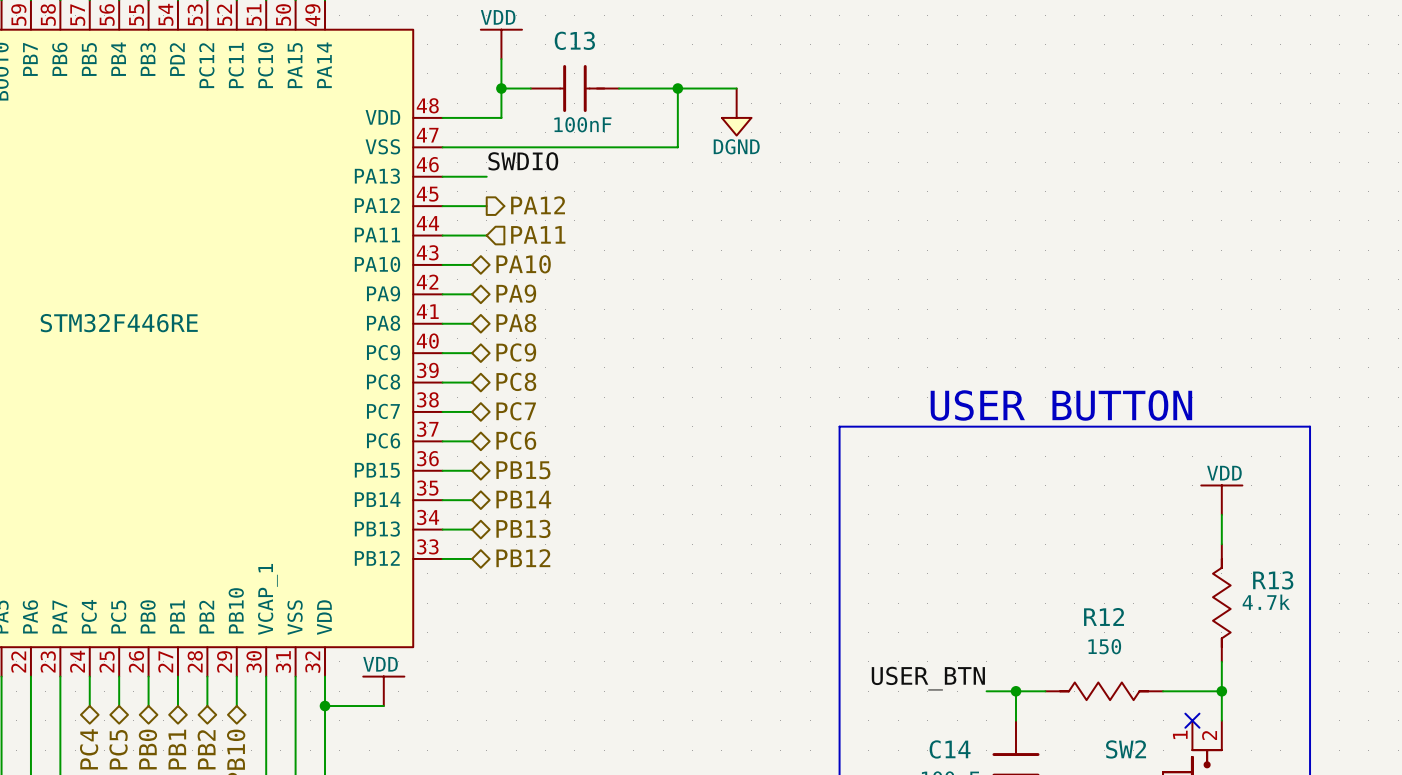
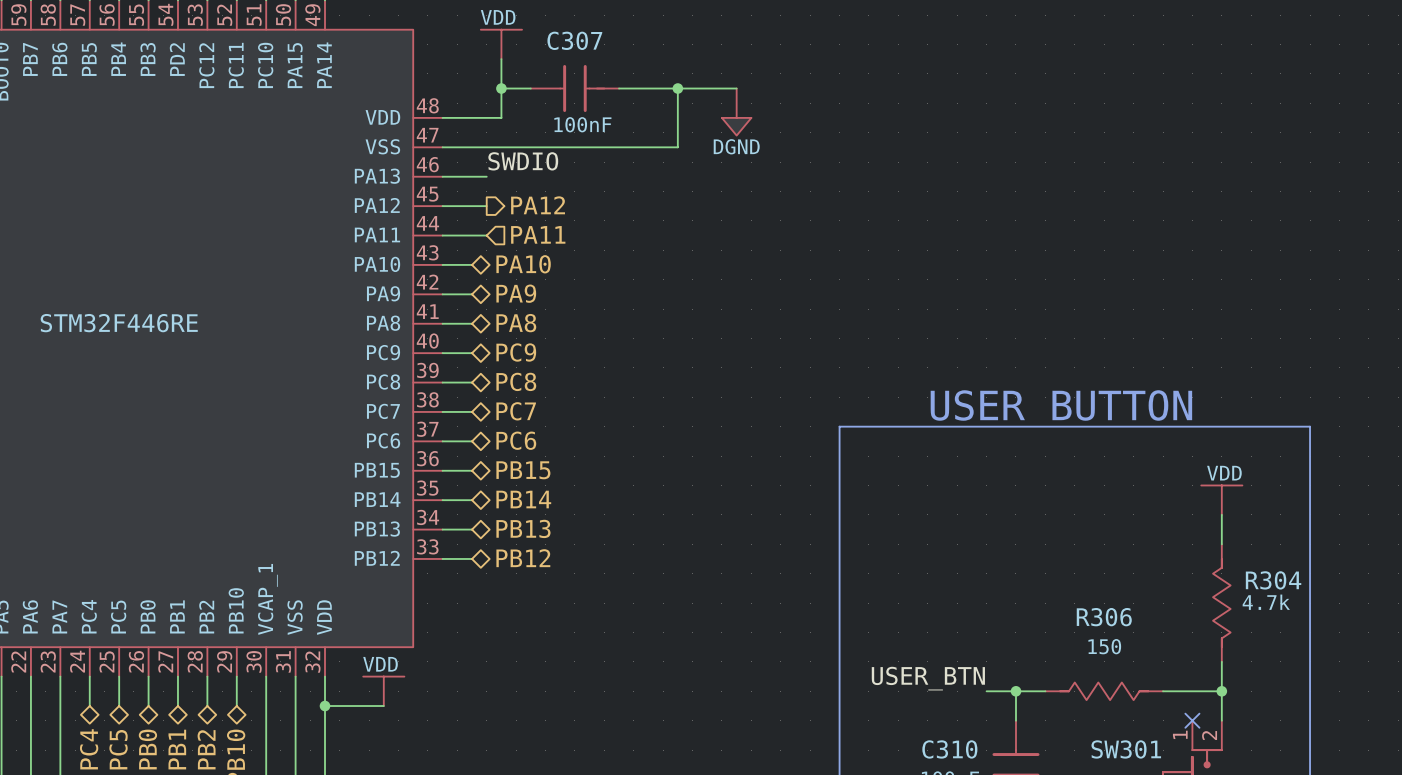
C13 name: C13 (574, 40) -> C307 (574, 40)
R13 name: R13 (1273, 580) -> R304 (1273, 580)
R12 name: R12 (1104, 616) -> R306 (1104, 617)
C14 name: C14 (950, 749) -> C310 (949, 749)
SW2 name: SW2 (1126, 749) -> SW301 (1126, 749)

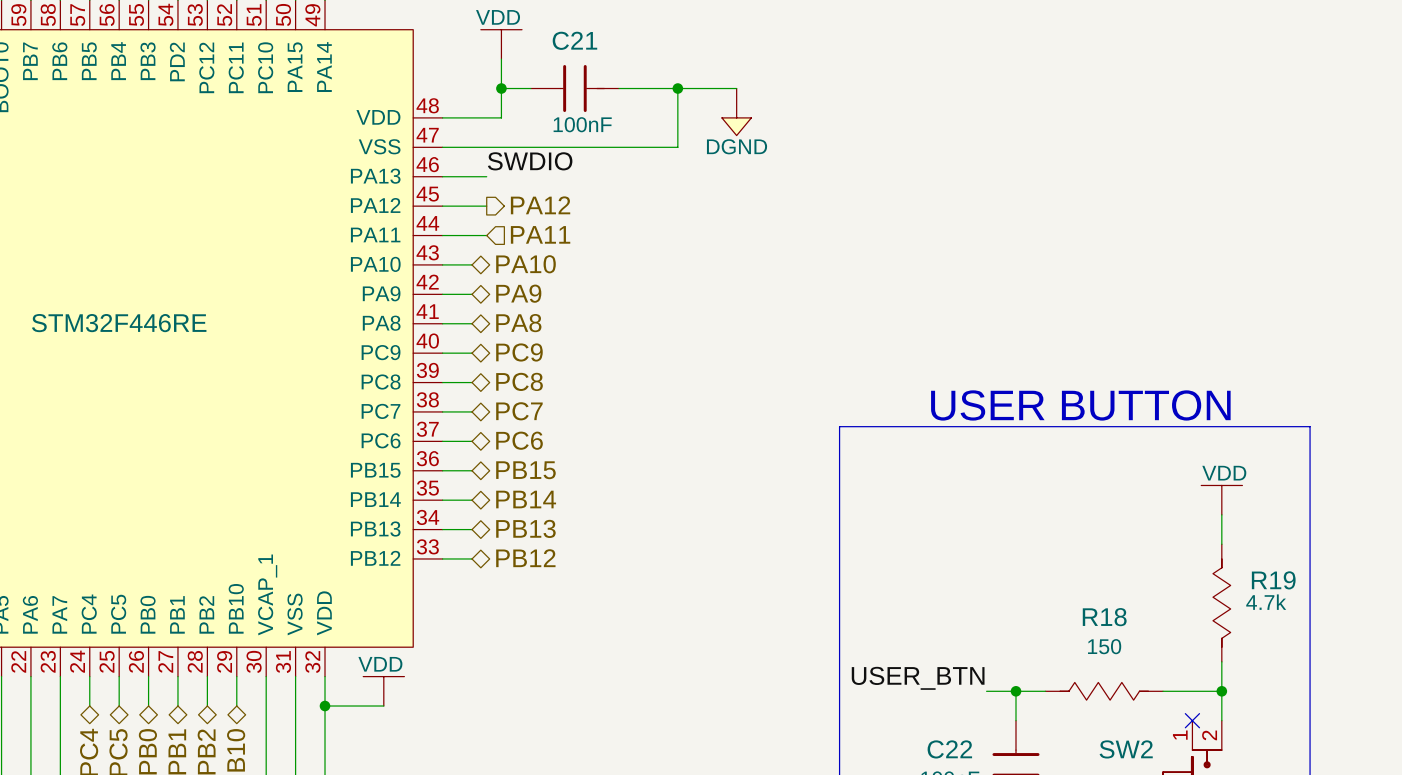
C307 name: C307 (574, 40) -> C21 (574, 40)
R304 name: R304 (1273, 580) -> R19 (1273, 580)
R306 name: R306 (1104, 617) -> R18 (1104, 617)
C310 name: C310 (949, 749) -> C22 (949, 749)
SW301 name: SW301 (1126, 749) -> SW2 (1126, 749)

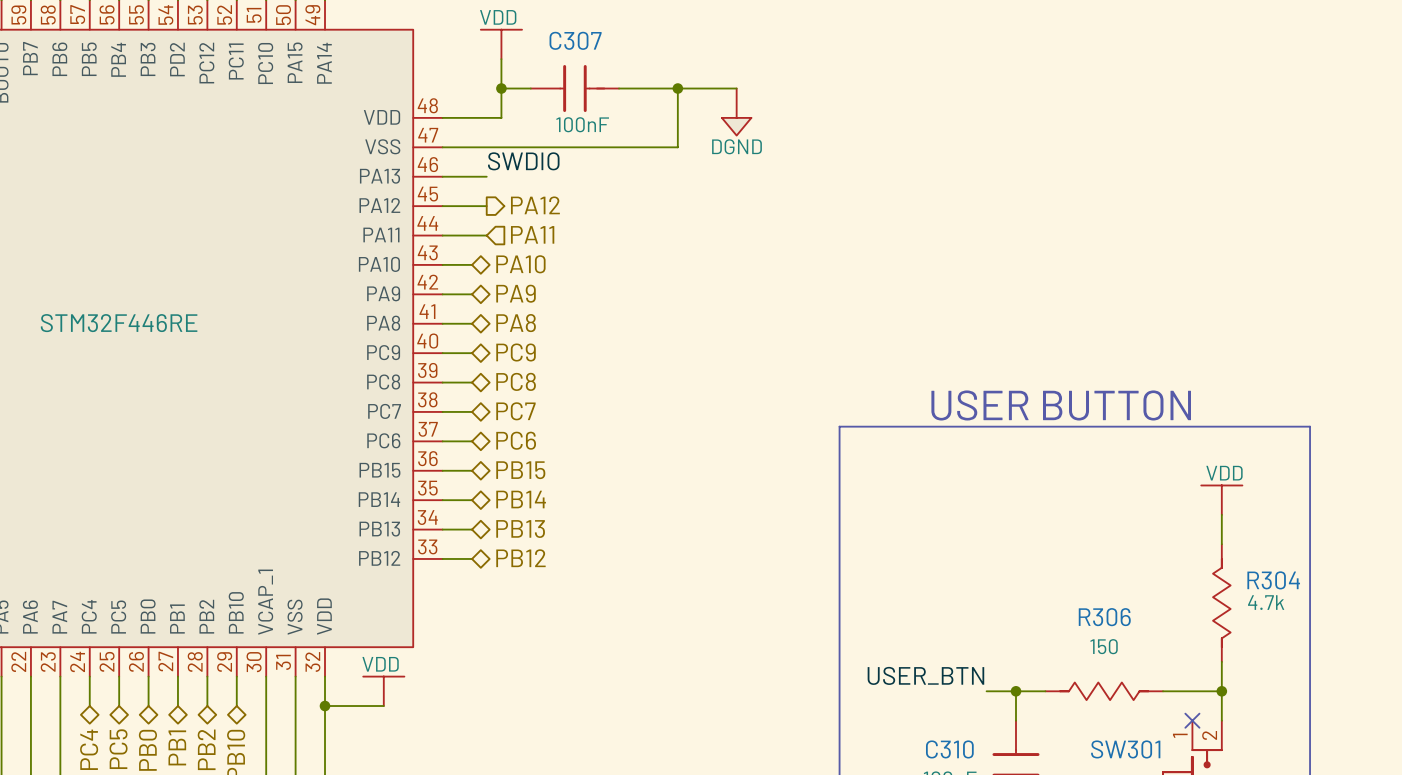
C21 name: C21 (574, 40) -> C307 (575, 40)
R19 name: R19 (1273, 580) -> R304 (1273, 580)
R18 name: R18 (1104, 617) -> R306 (1104, 617)
C22 name: C22 (949, 749) -> C310 (949, 749)
SW2 name: SW2 (1126, 749) -> SW301 (1125, 749)

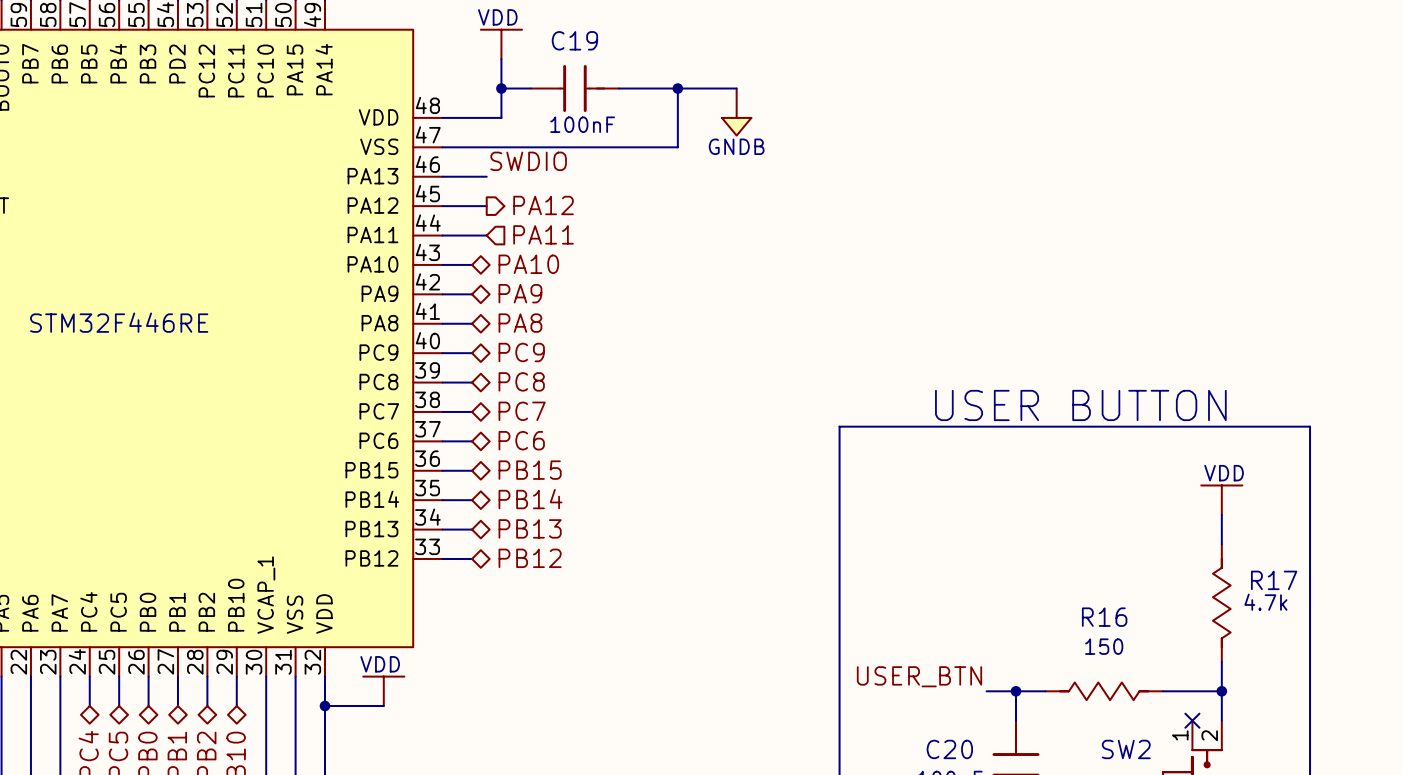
C307 name: C307 (575, 40) -> C19 (574, 40)
power symbol: DGND (736, 112) -> GNDB (736, 112)
R304 name: R304 (1273, 580) -> R17 (1274, 580)
R306 name: R306 (1104, 617) -> R16 (1104, 617)
C310 name: C310 (949, 749) -> C20 (949, 749)
SW301 name: SW301 (1125, 749) -> SW2 (1126, 749)

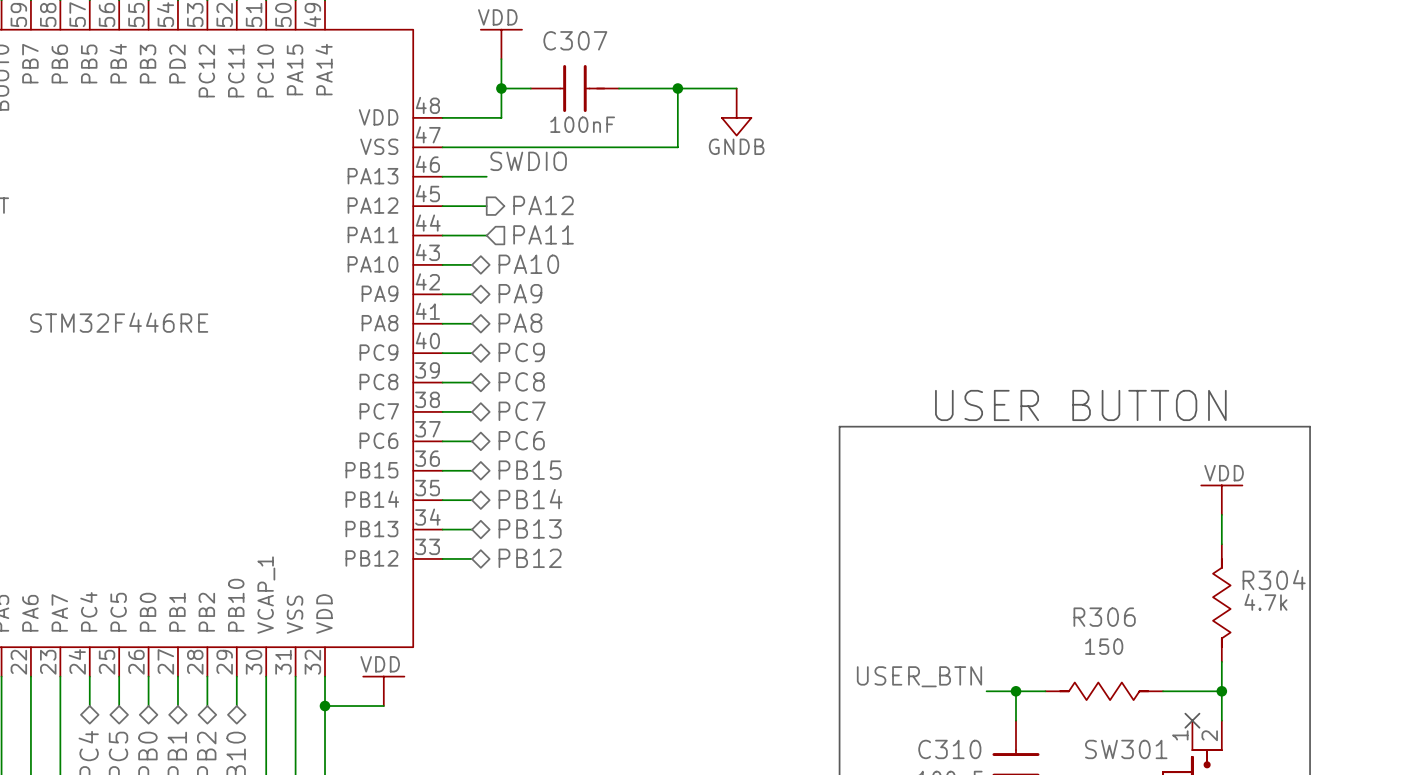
C19 name: C19 (574, 40) -> C307 (575, 40)
R17 name: R17 (1274, 580) -> R304 (1274, 579)
R16 name: R16 (1104, 617) -> R306 (1104, 617)
C20 name: C20 (949, 749) -> C310 (949, 749)
SW2 name: SW2 (1126, 749) -> SW301 (1126, 749)

